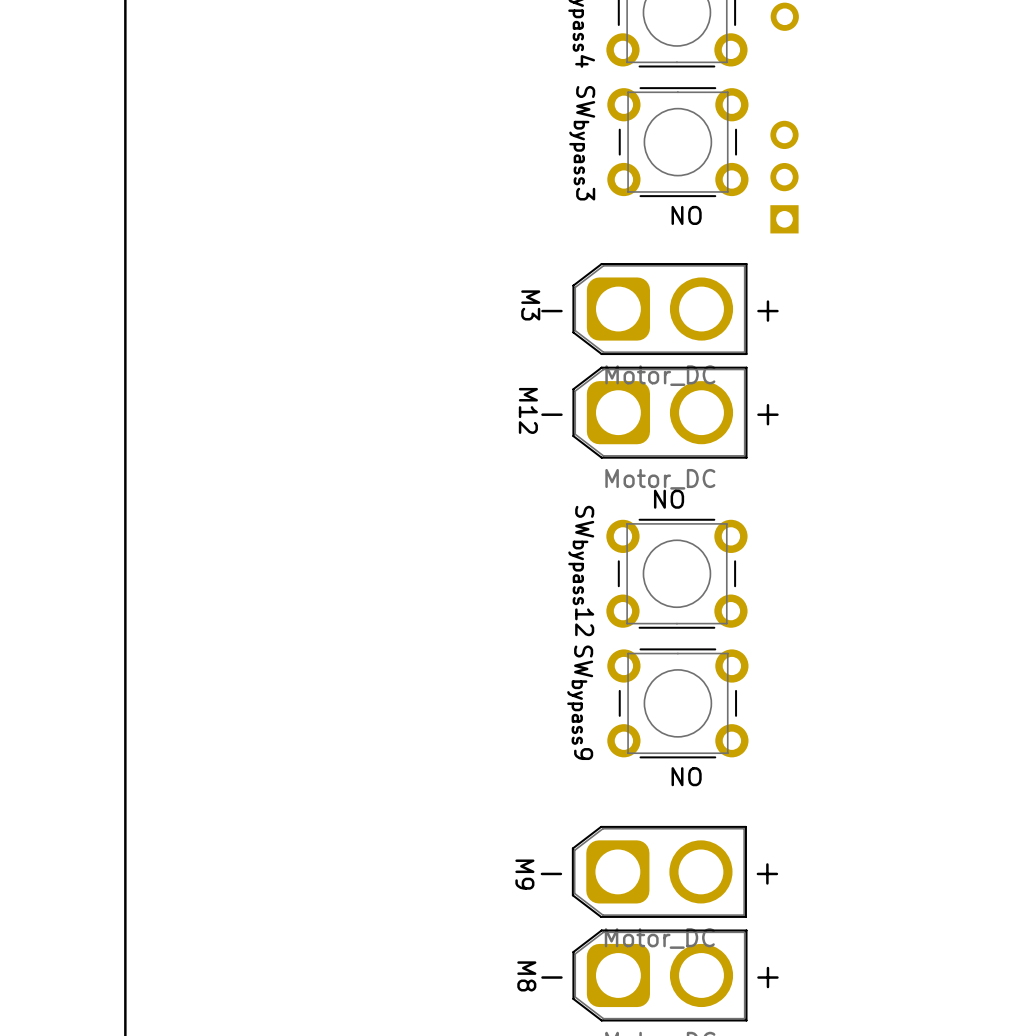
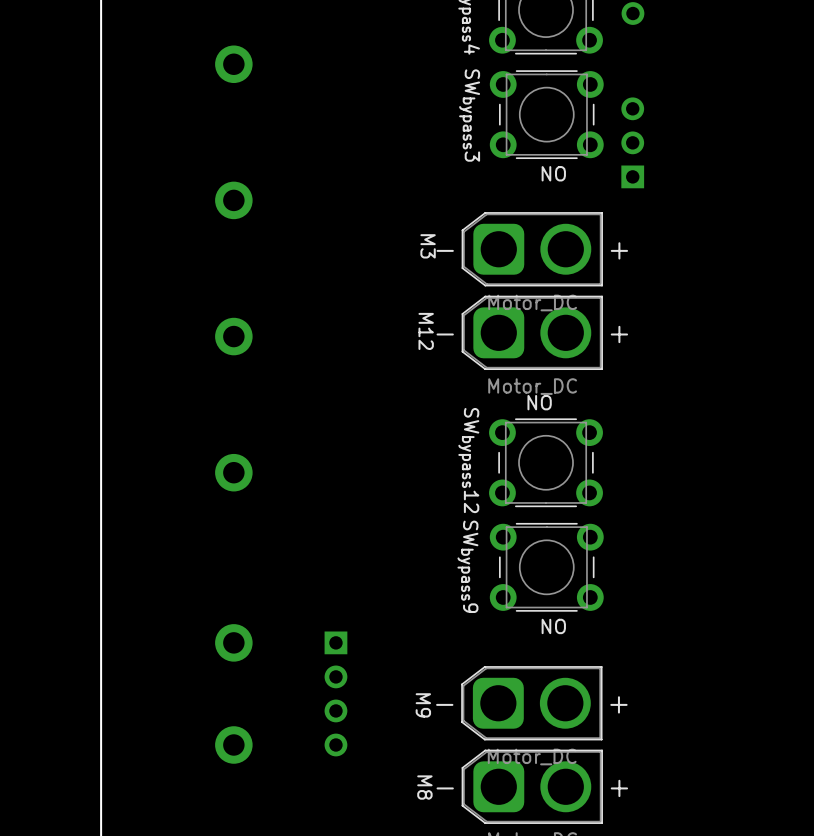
part: none -> (233, 64)
part: none -> (233, 200)
part: none -> (233, 336)
part: none -> (233, 472)
part: none -> (233, 642)
part: none -> (335, 693)
part: none -> (233, 744)

